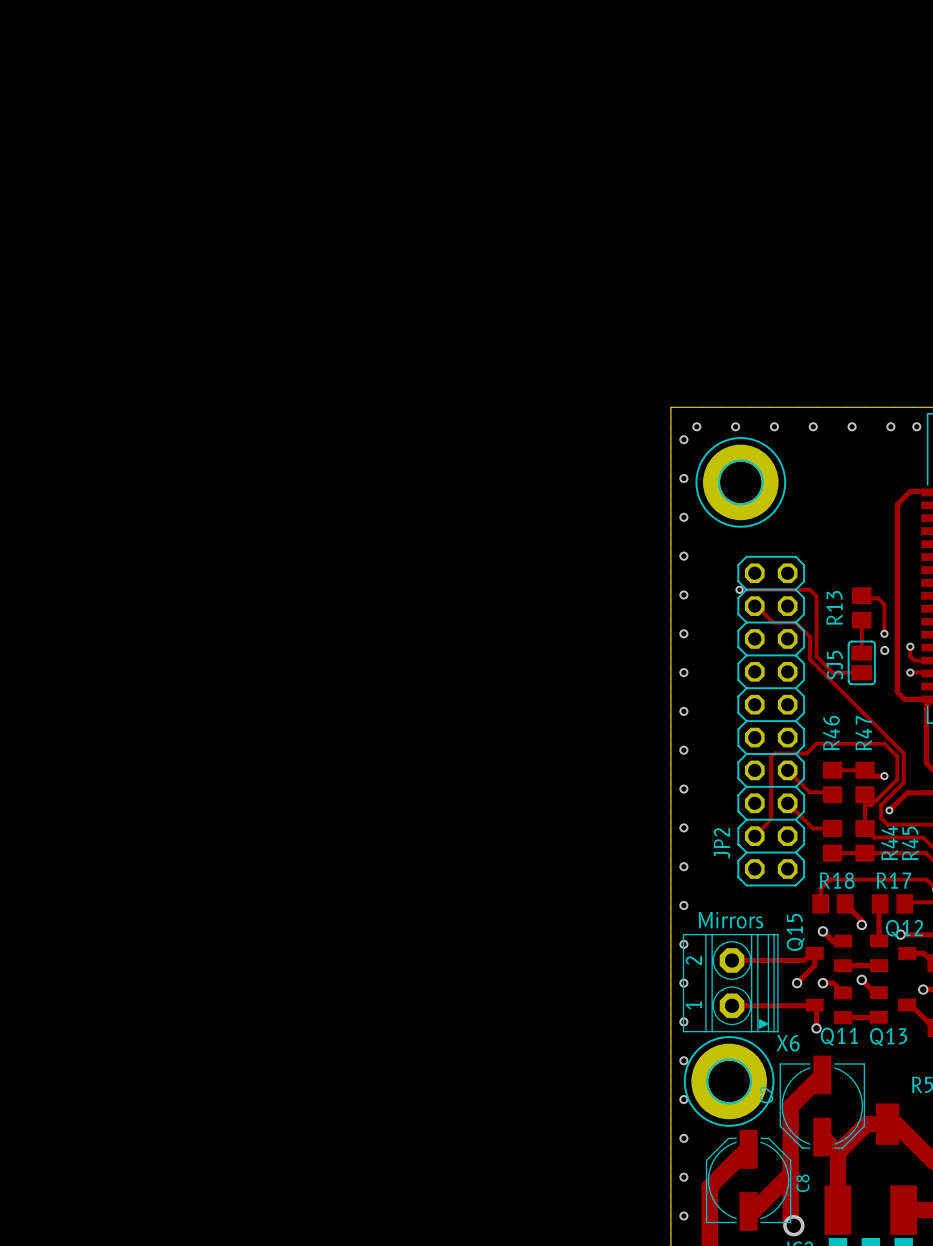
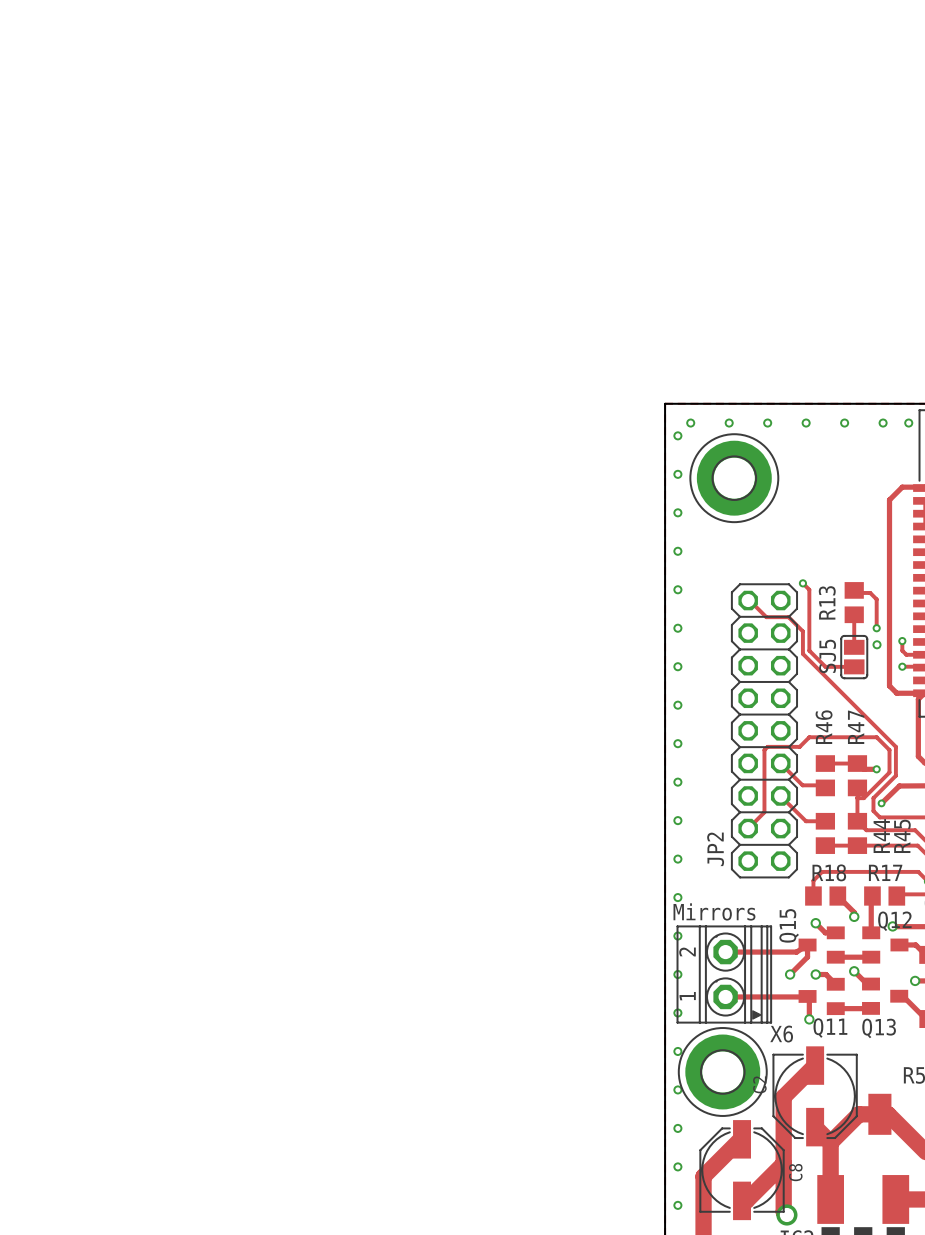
JP2 footprint: [737, 555, 806, 887] -> [730, 583, 799, 879]
track: (739, 589) (810, 589) (816, 596) -> (802, 583) (809, 591)
via position: (739, 589) -> (802, 583)

